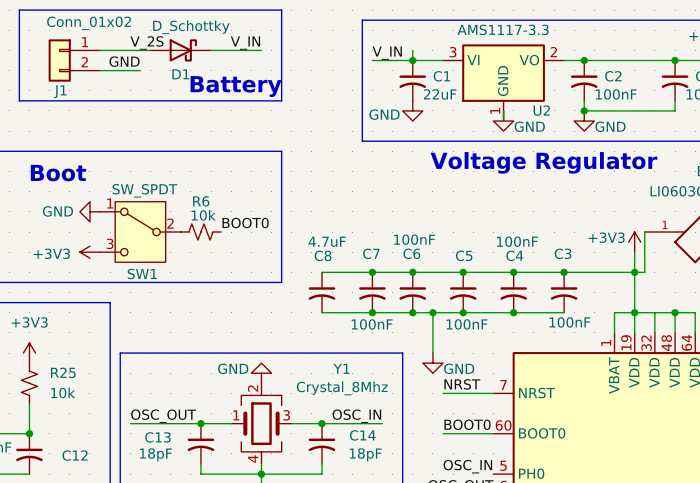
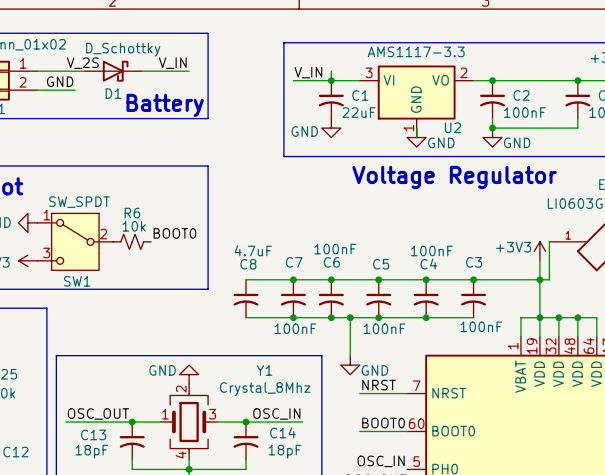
junction: none -> (558, 317)

